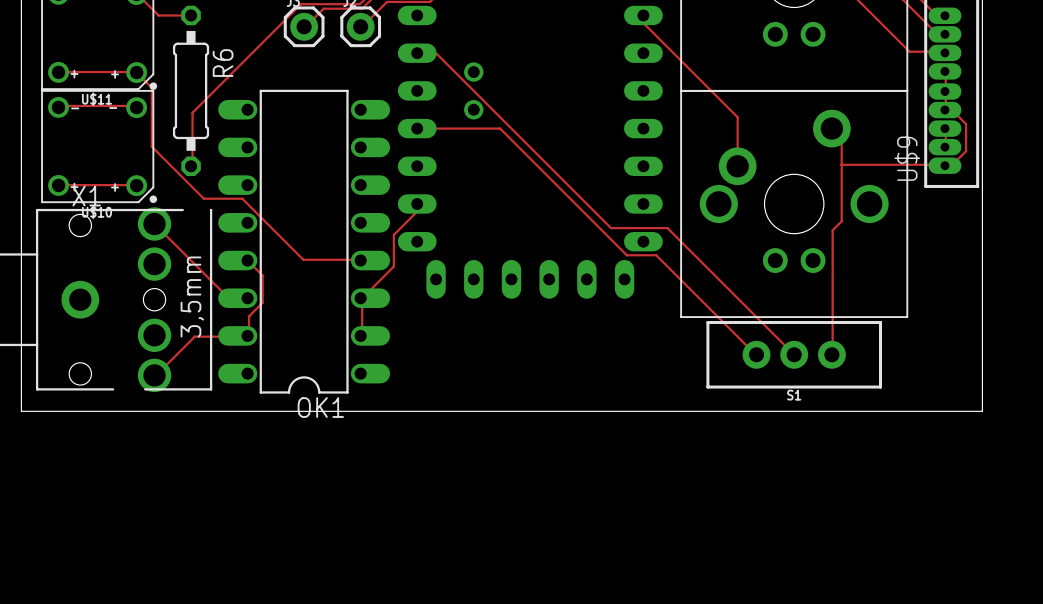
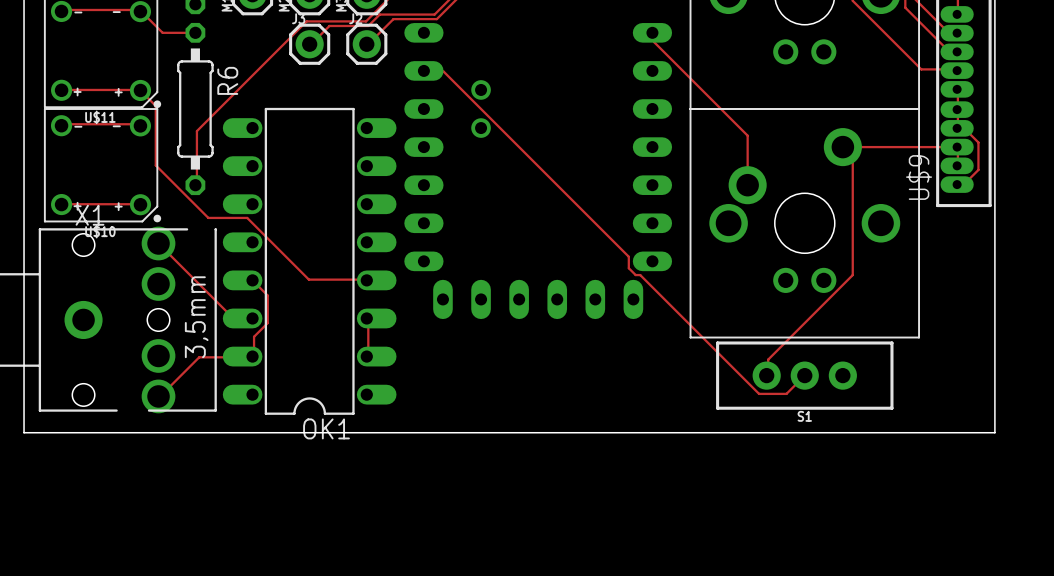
track: (417, 128) (500, 128) (620, 248) -> (619, 247) (628, 256) (628, 268)
track: none -> (843, 147) (957, 147)
track: (841, 164) (944, 165) -> none
track: (417, 203) (416, 212) (393, 234) (393, 266) (362, 298) -> none
track: (841, 221) (832, 230) (831, 354) -> (852, 240) (852, 275) (768, 359) (768, 375) (766, 375)
track: (610, 228) (667, 228) (794, 354) -> (640, 275) (759, 393) (786, 393) (804, 375)
track: (631, 255) (656, 255) (756, 354) -> none

